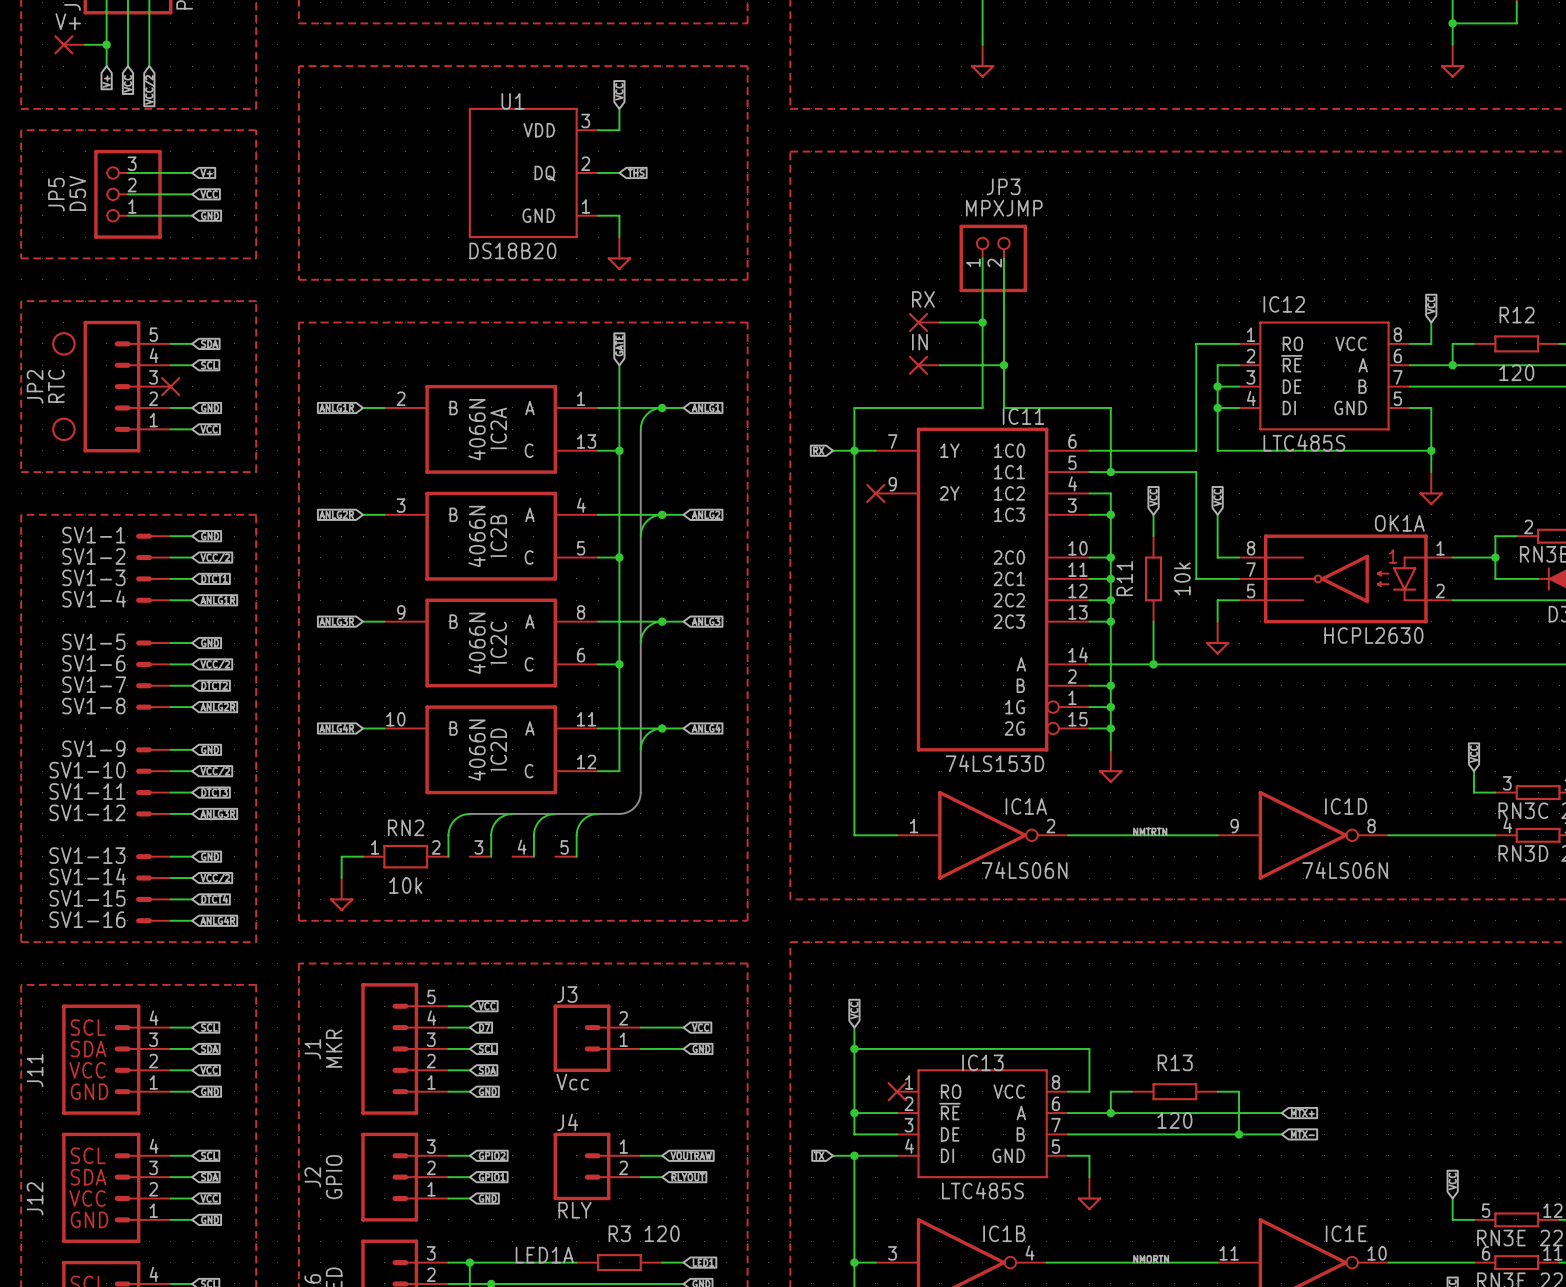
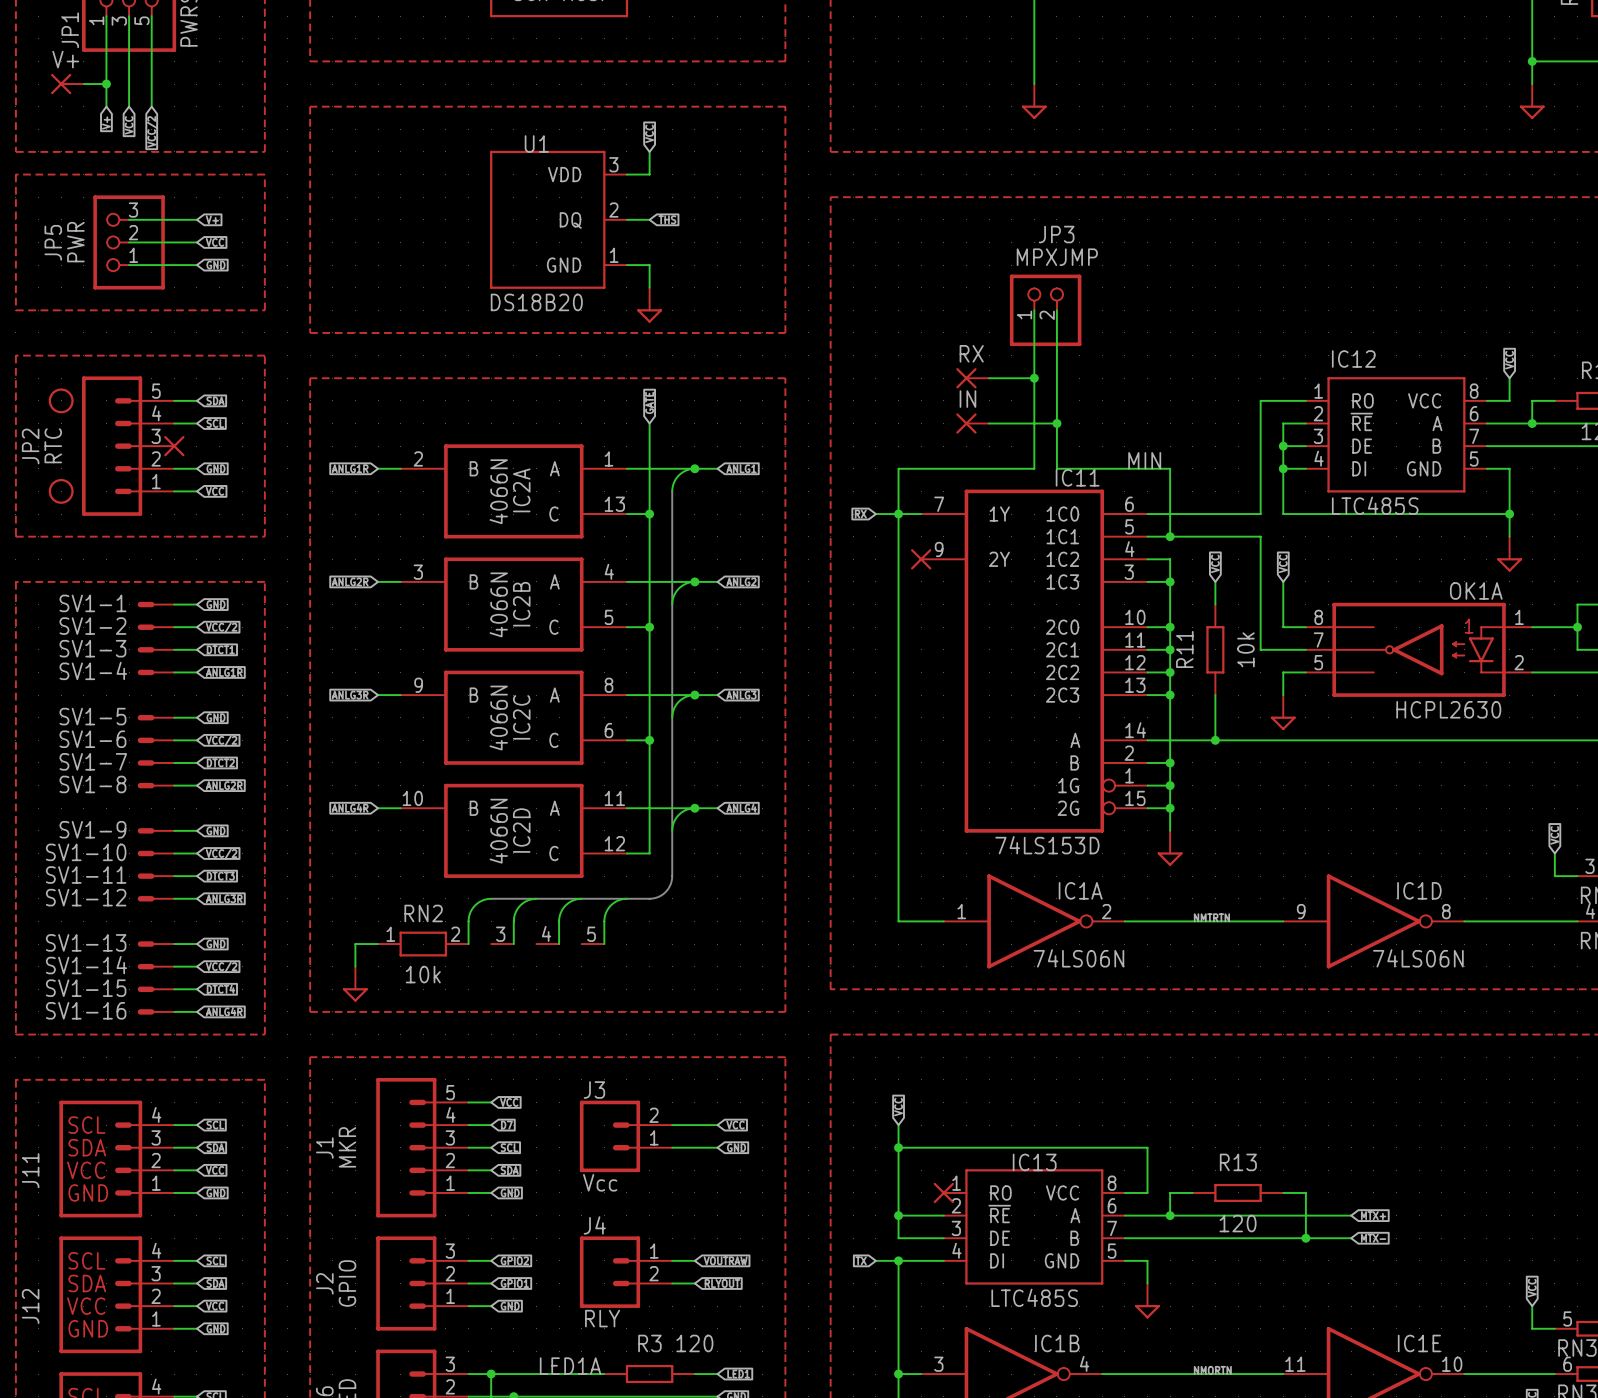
JP5 value: D5V (77, 193) -> PWR (75, 242)
label: none -> MIN (1144, 460)

